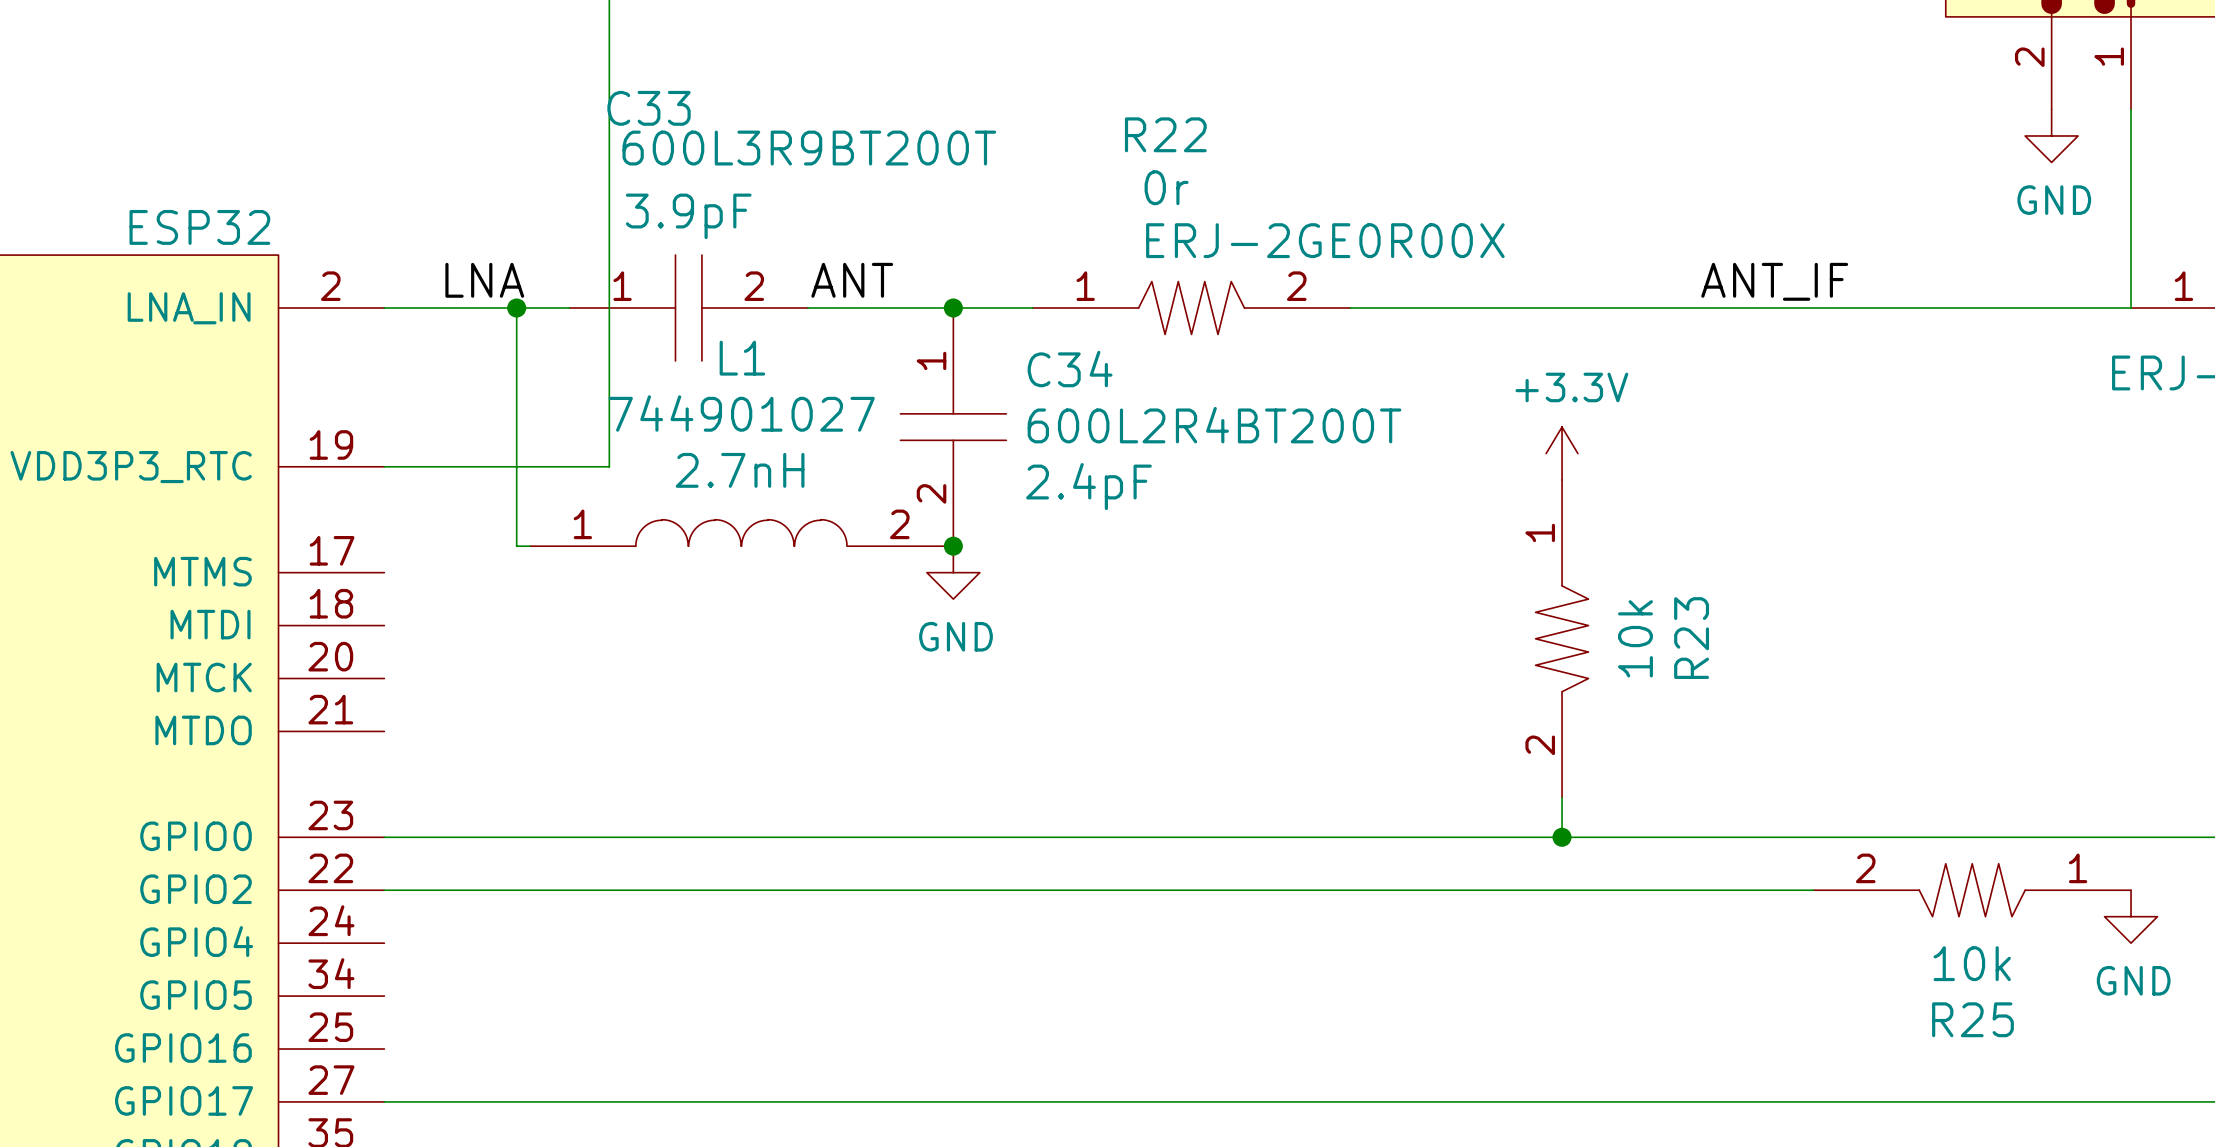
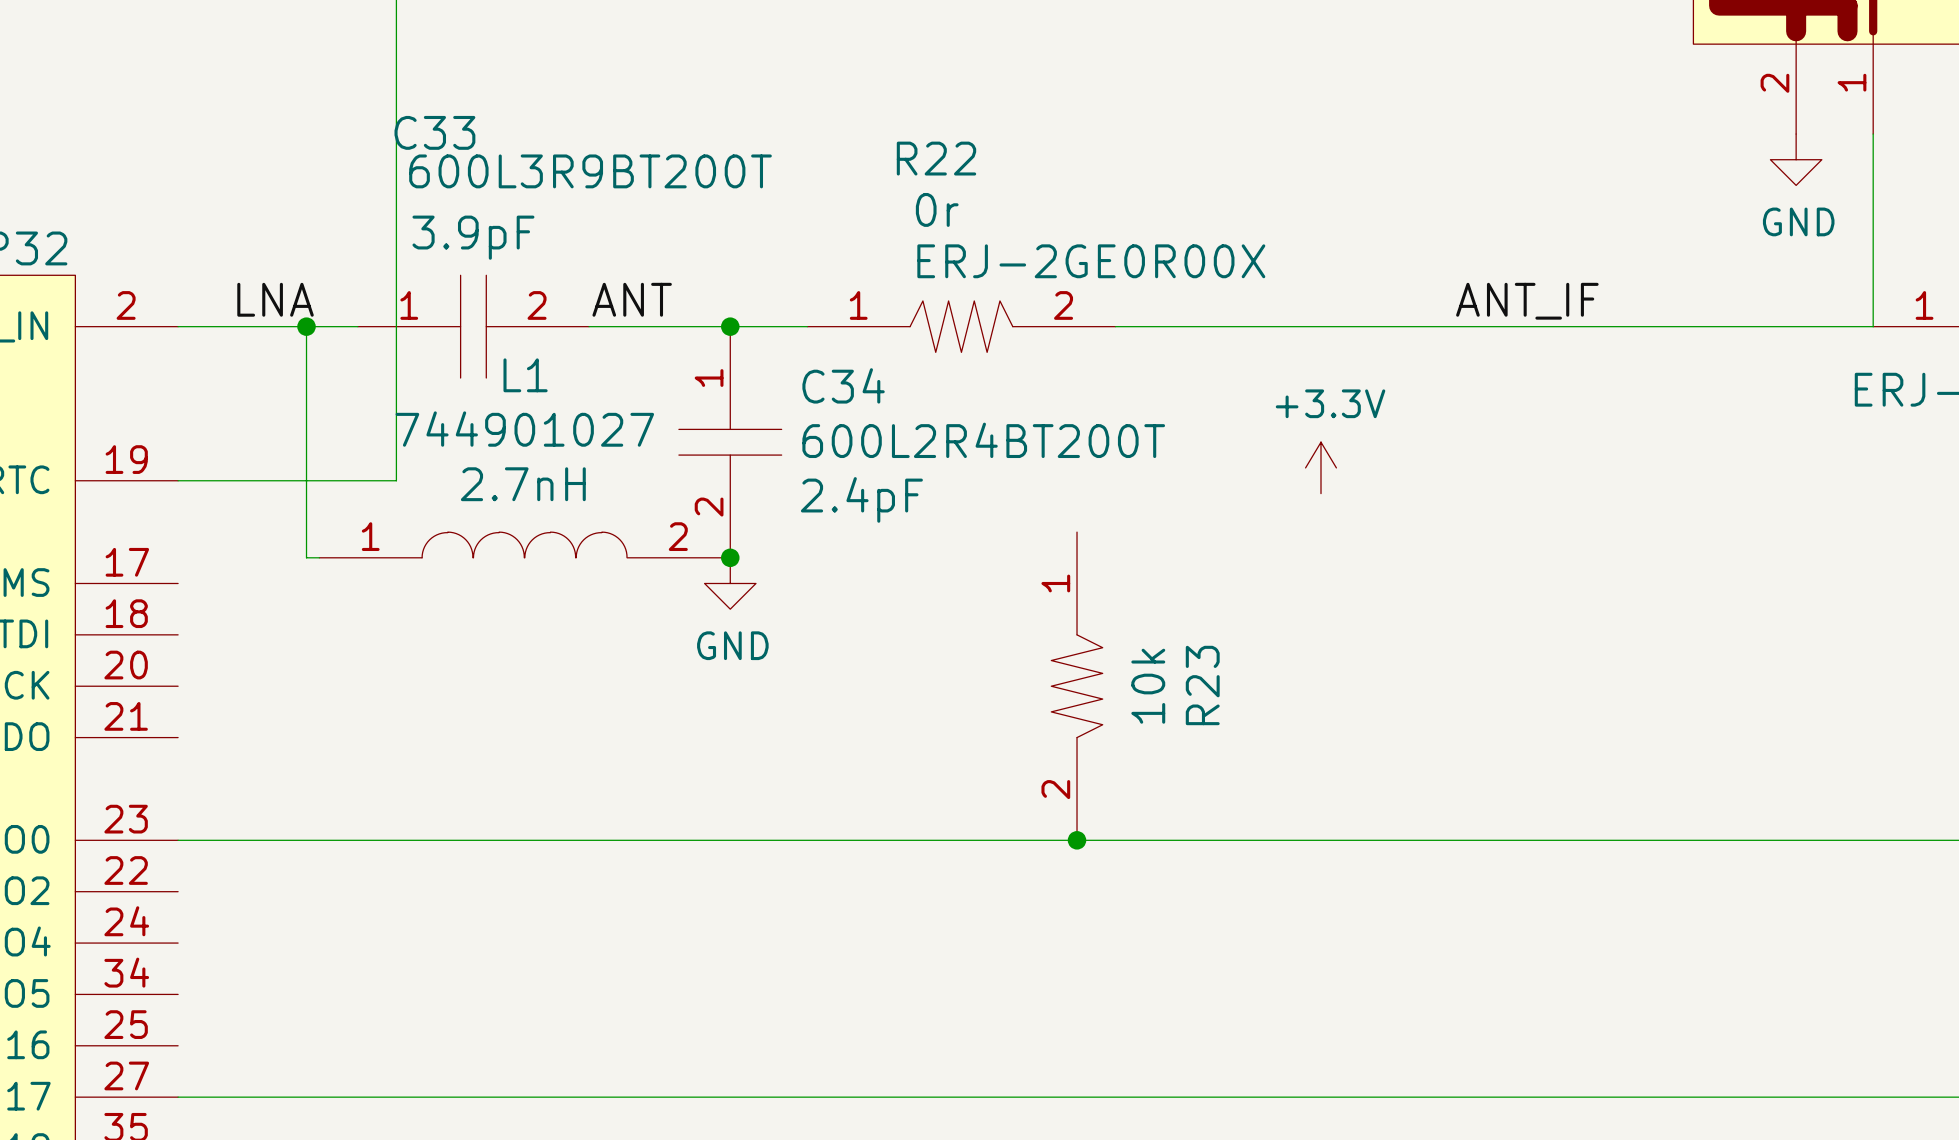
R23 position: (1562, 638) -> (1077, 686)
wire: (1562, 797) (1562, 837) -> none
junction: none -> (1077, 840)
junction: (1562, 837) -> none
wire: (384, 890) (1813, 890) -> none
R25: (1972, 890) -> none
power symbol: GND (2131, 916) -> none

